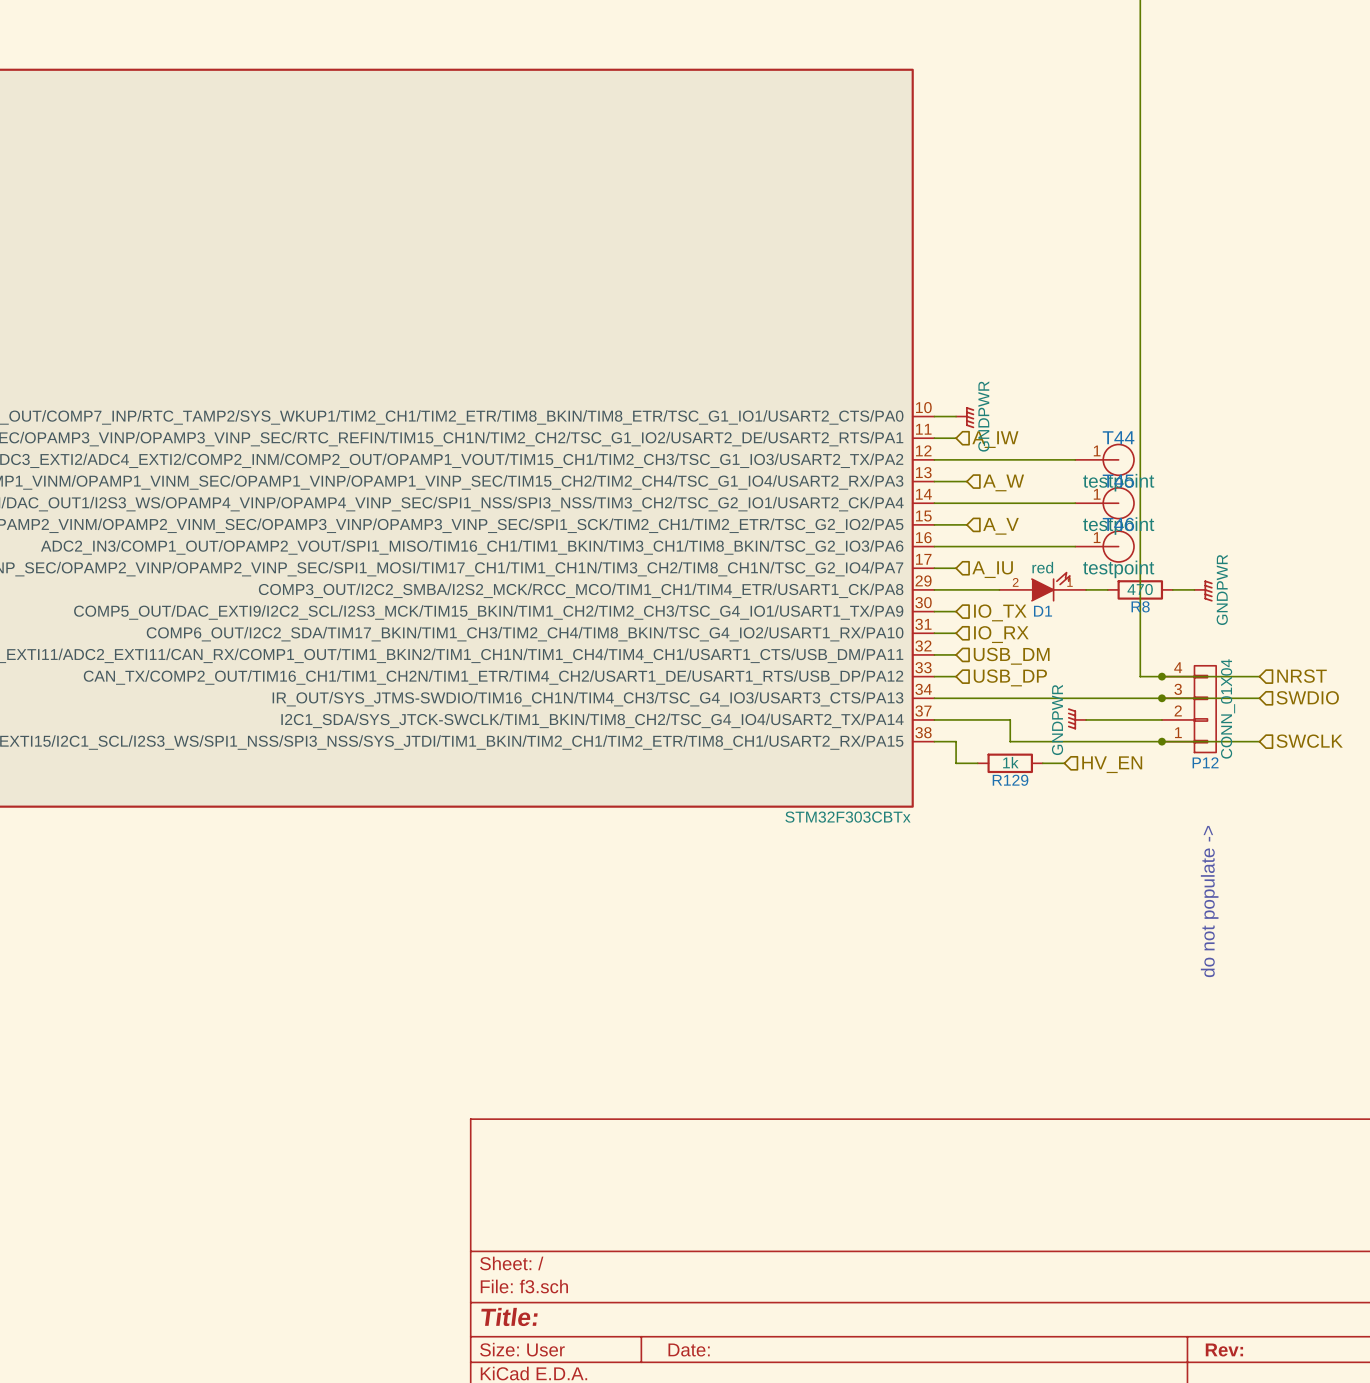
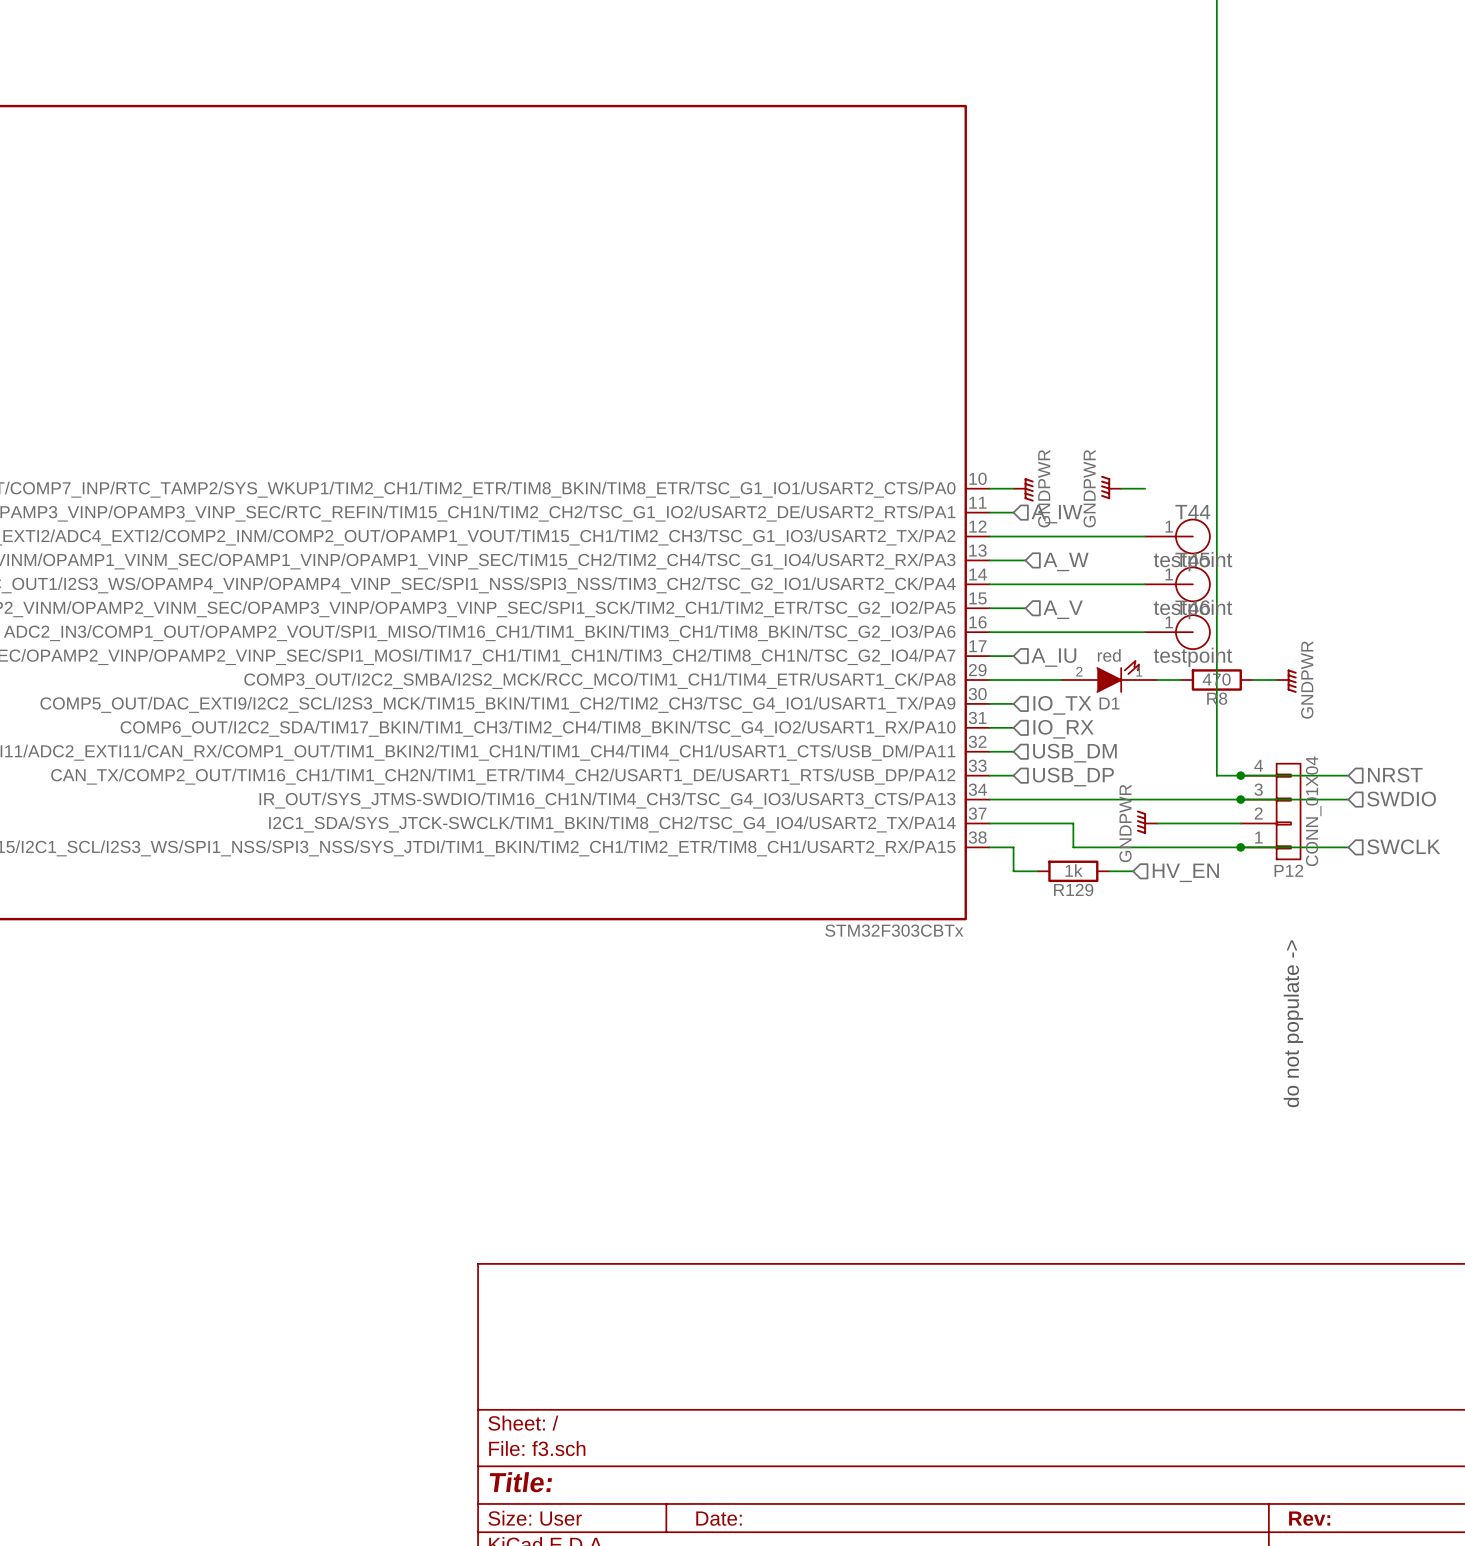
power symbol: none -> GNDPWR (1111, 487)
wire: none -> (1121, 488) (1145, 488)

